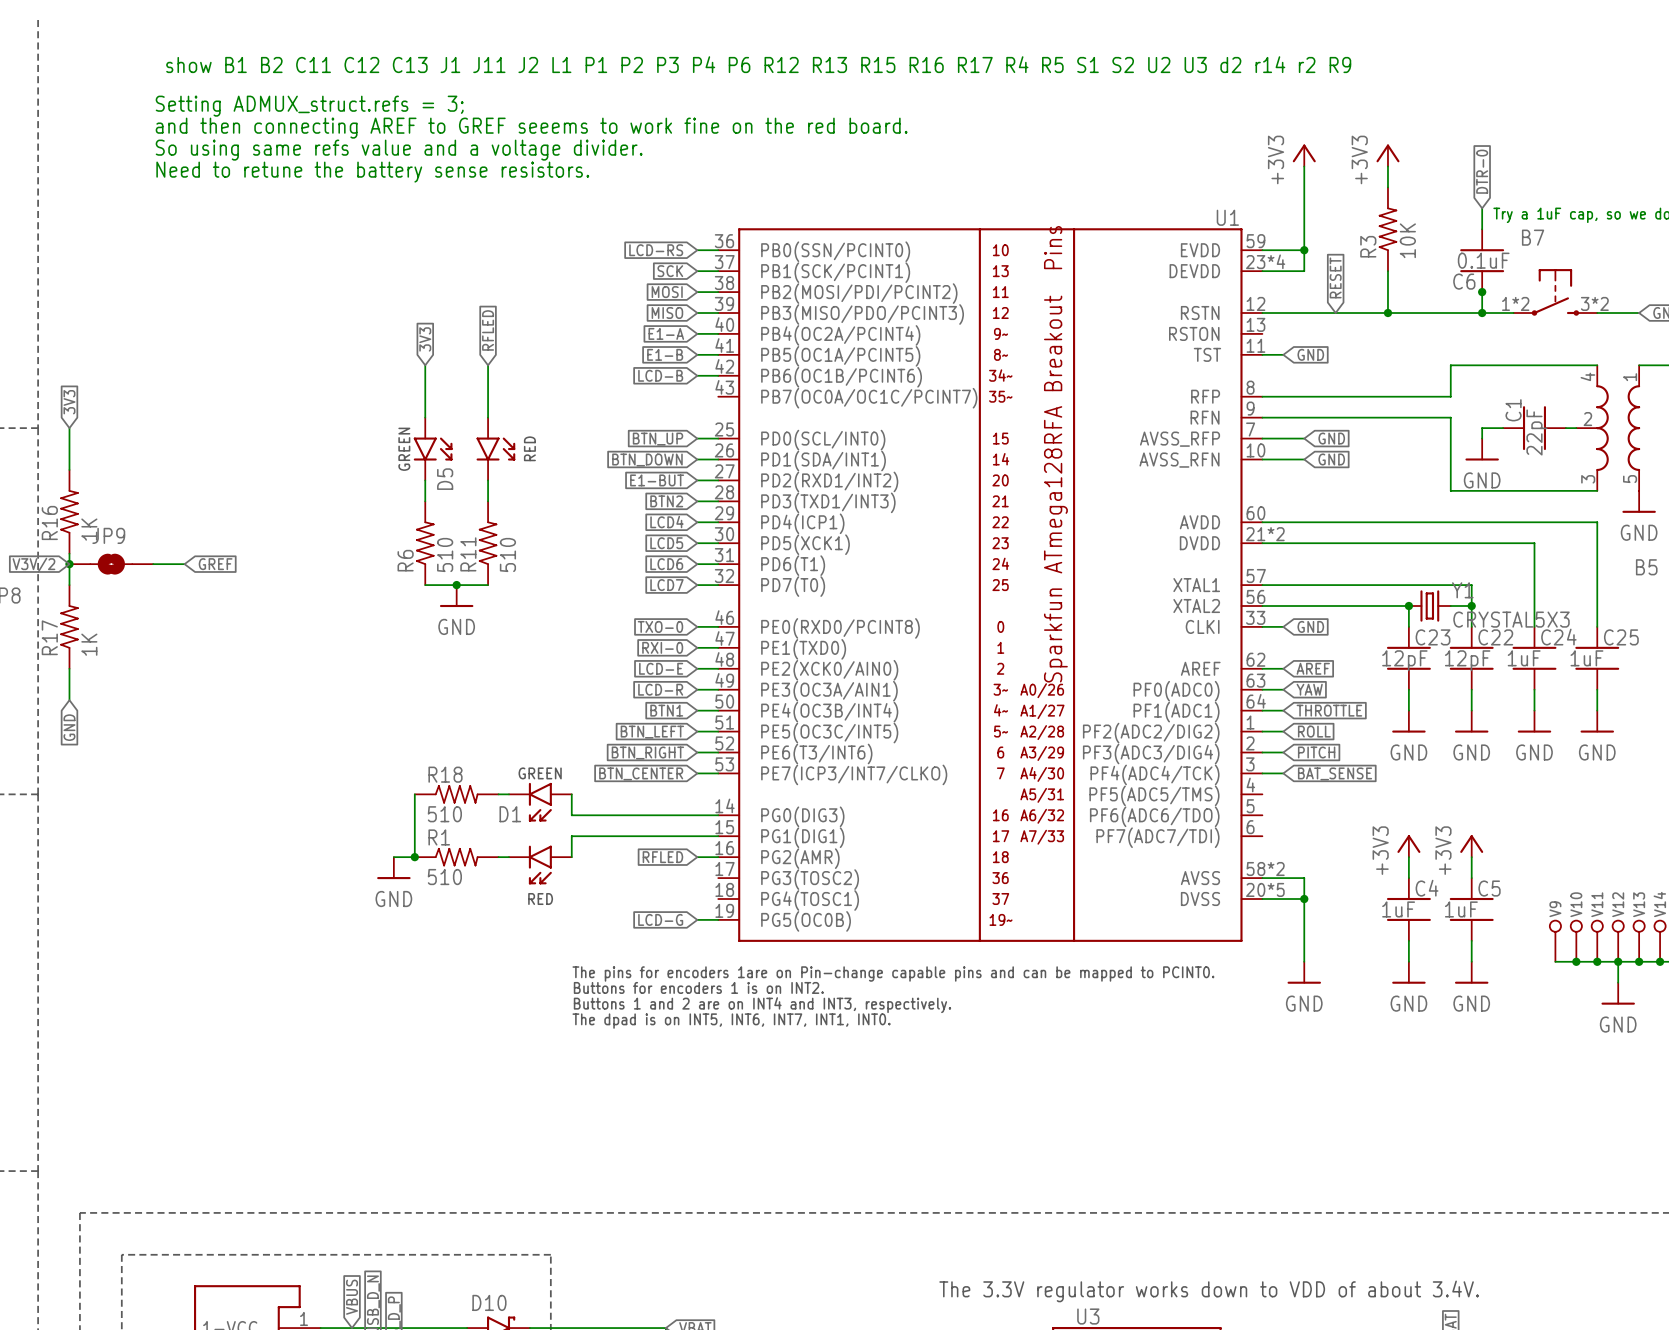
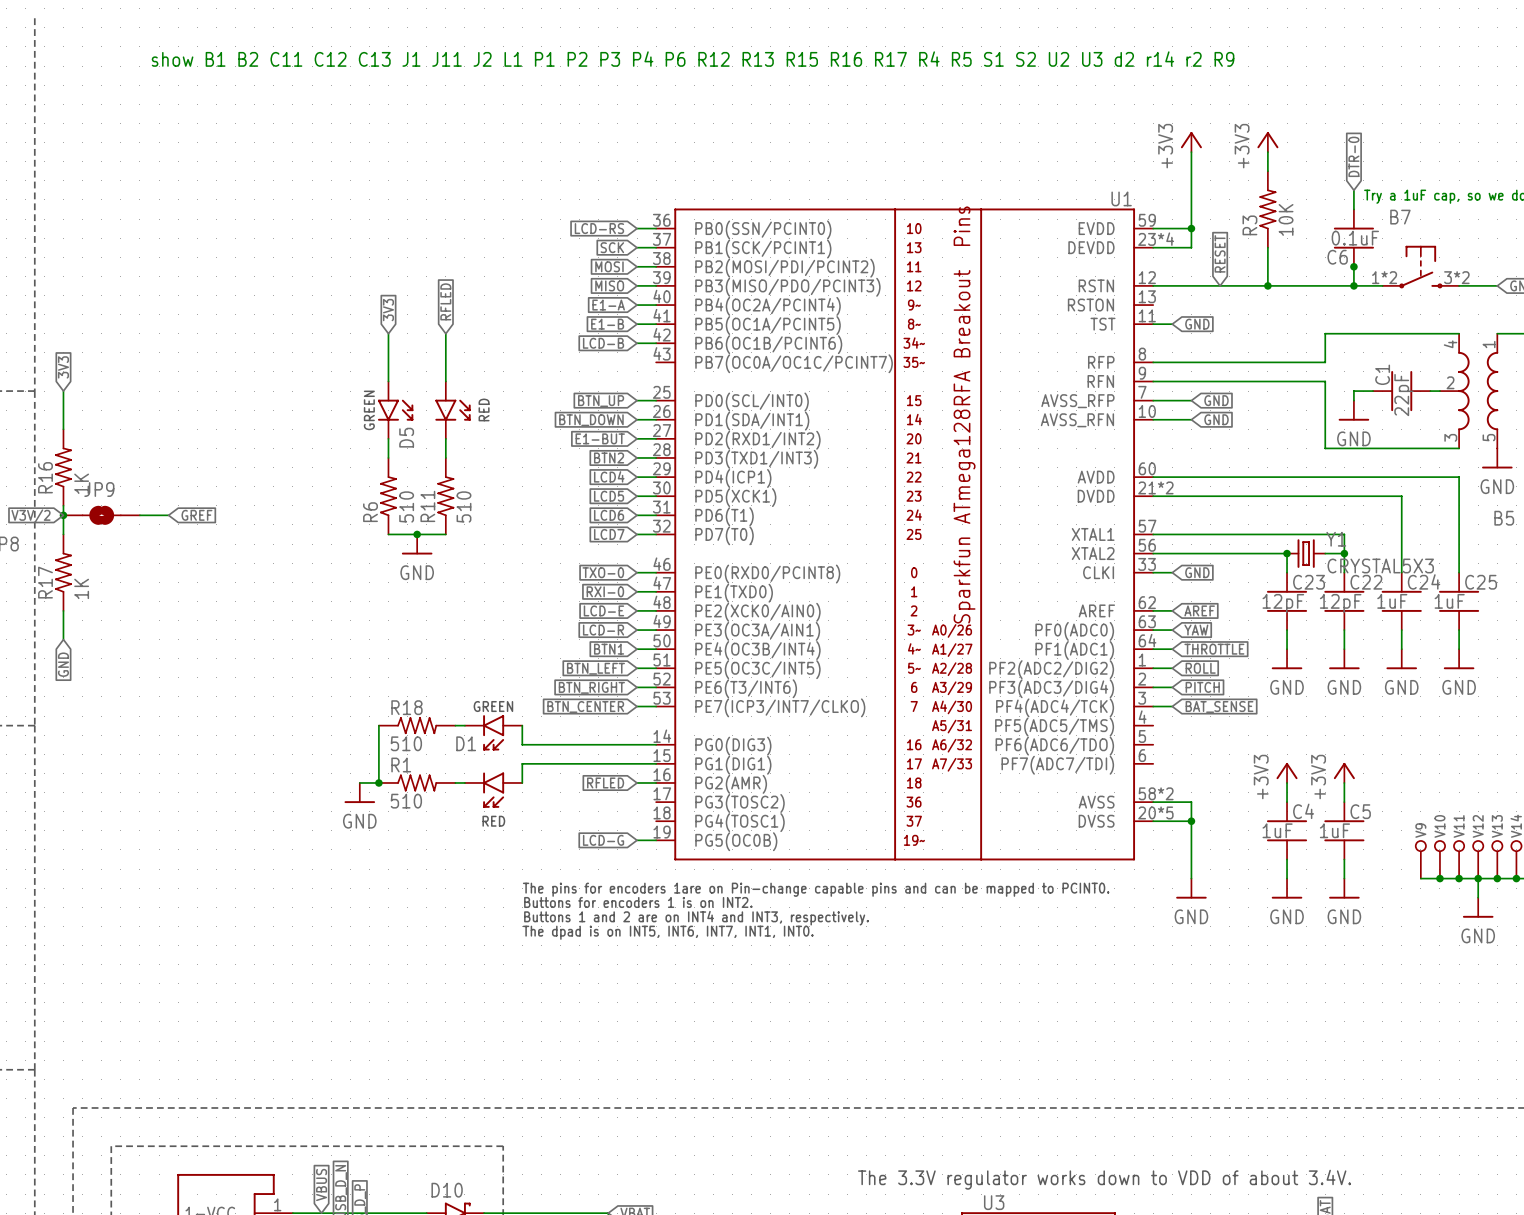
text: Setting ADMUX_struct.refs = 3; (309, 106) -> none
text: and then connecting AREF to GREF seeems to work fine on the red board. (531, 128) -> none
text: So using same refs value and a voltage divider. (399, 150) -> none
text: Need to retune the battery sense resistors. (372, 172) -> none

